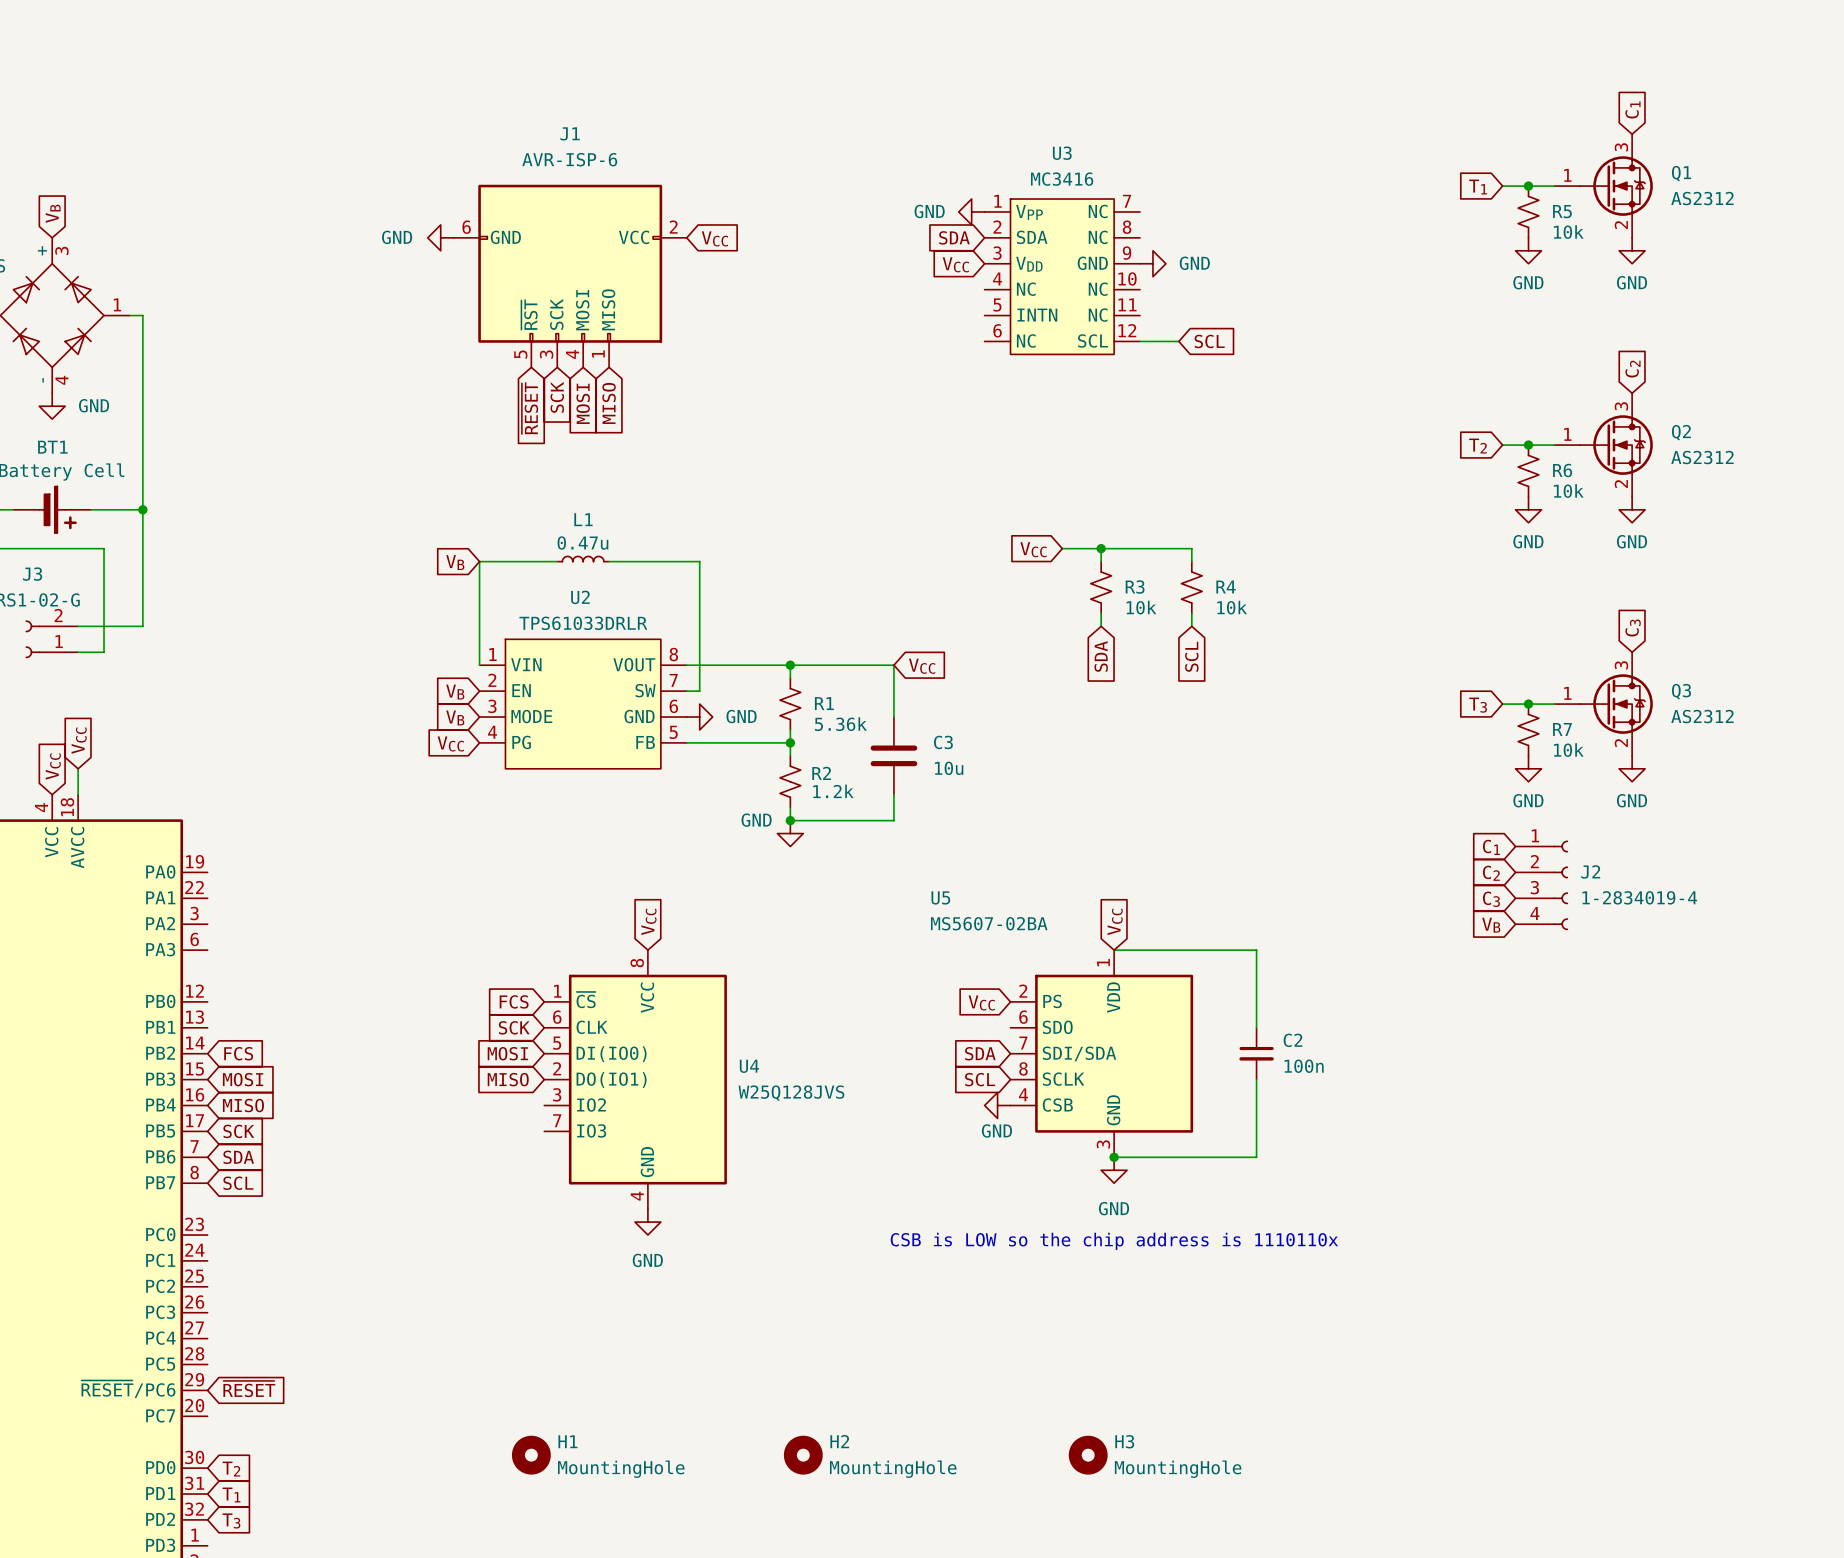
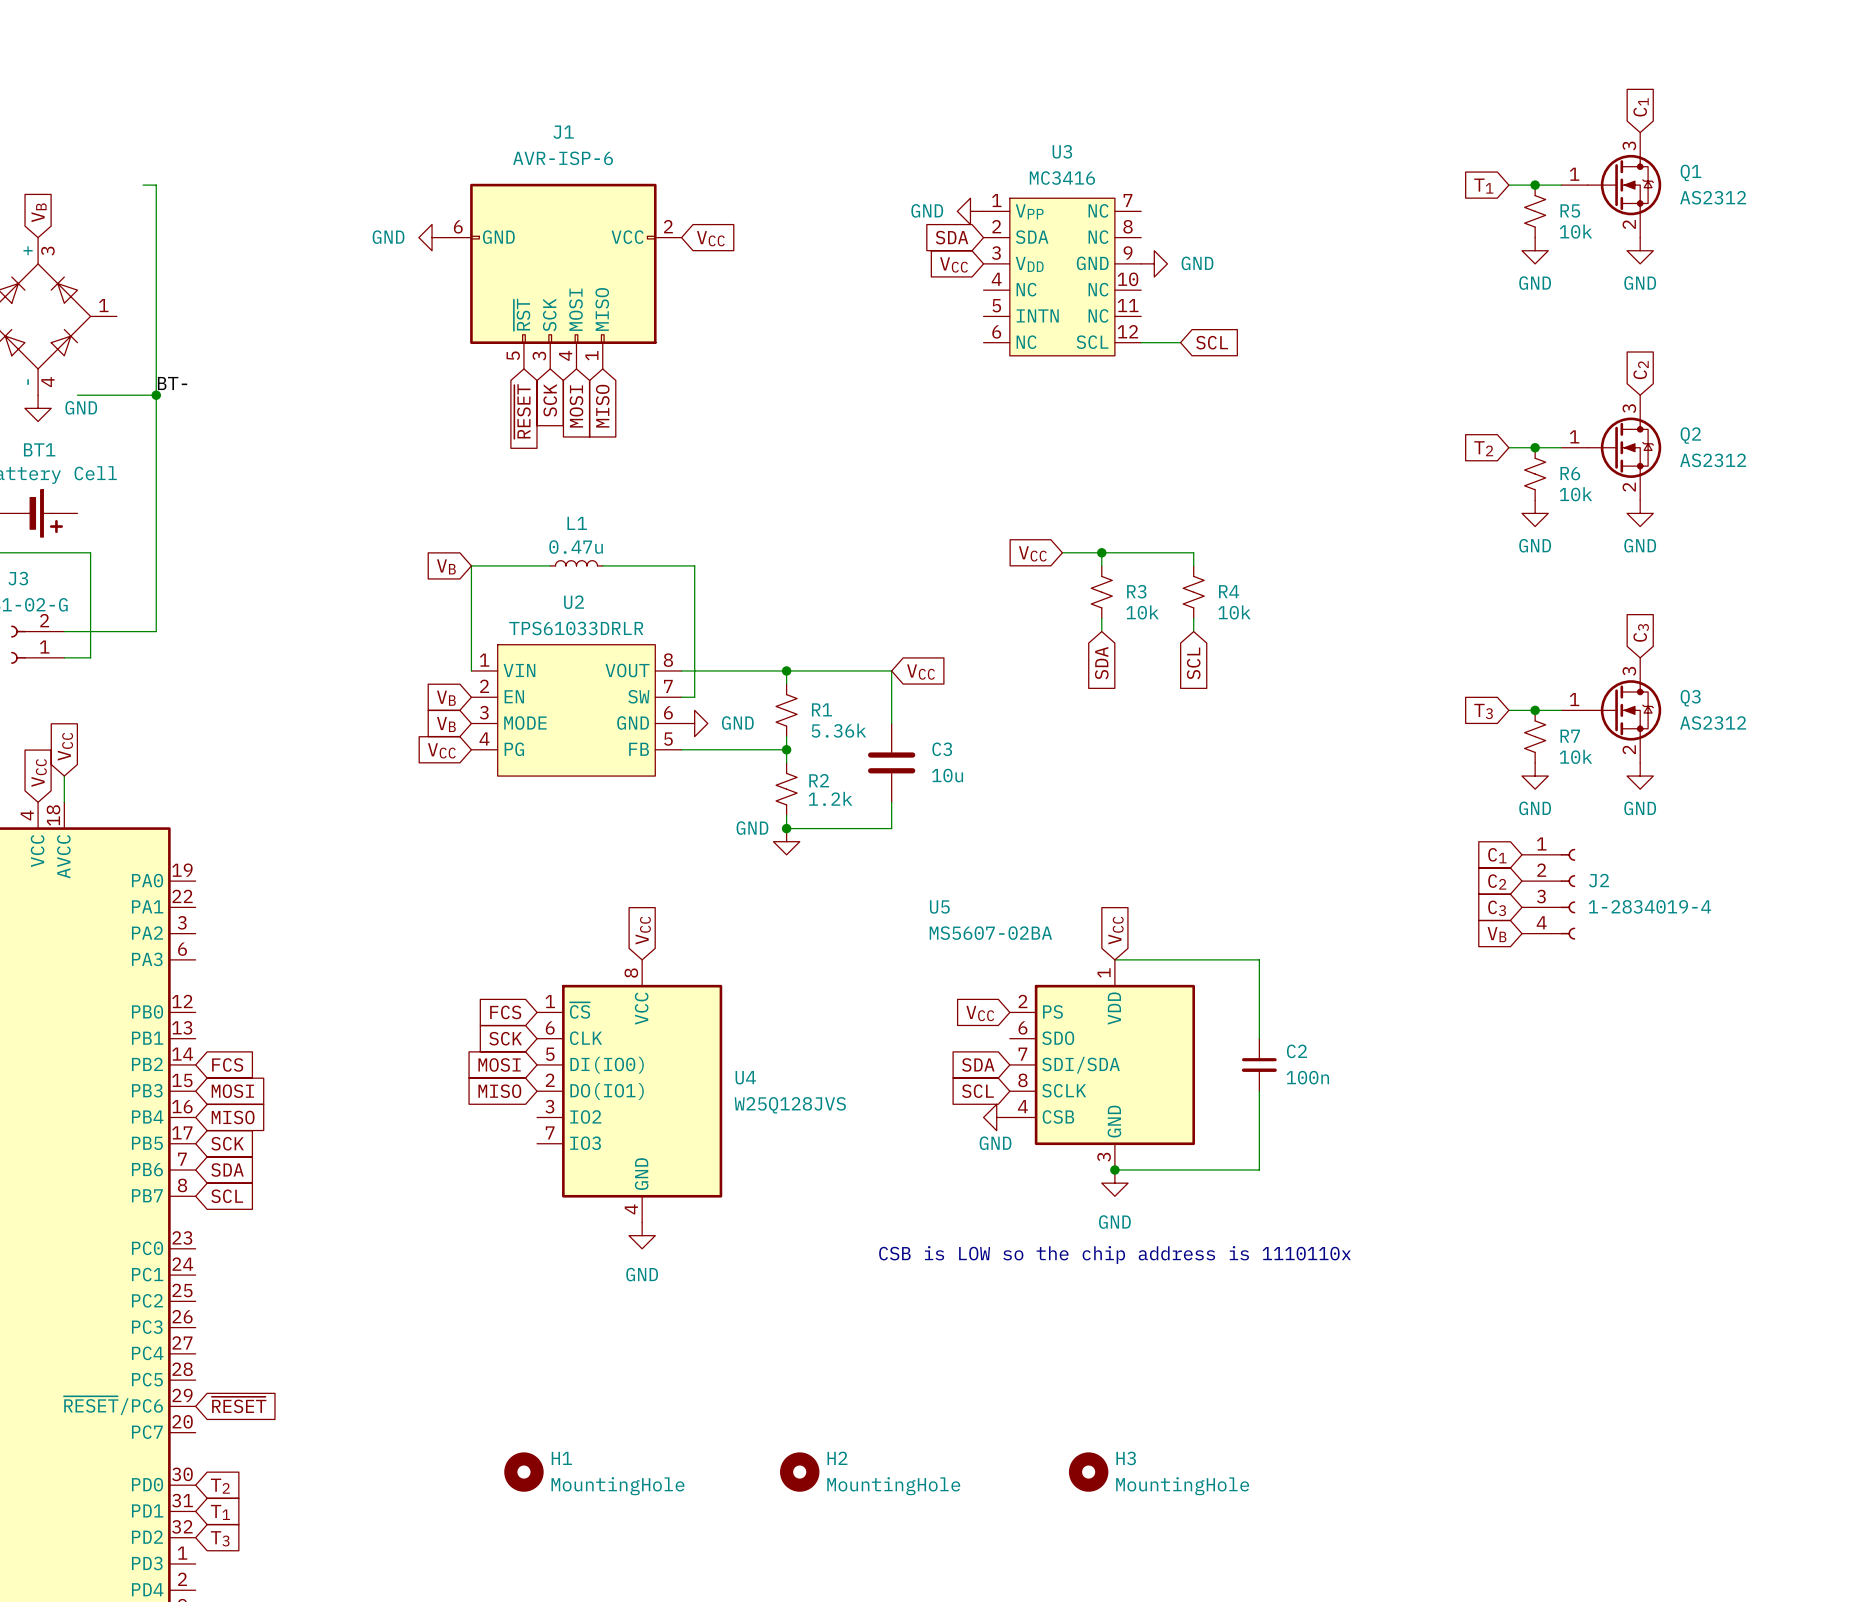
wire: (129, 315) (142, 315) (142, 626) -> (143, 185) (156, 185) (156, 631) (129, 631)
label: none -> BT- (172, 383)
wire: none -> (77, 395) (156, 395)
junction: none -> (156, 395)
wire: (91, 509) (142, 509) -> none
junction: (142, 509) -> none

